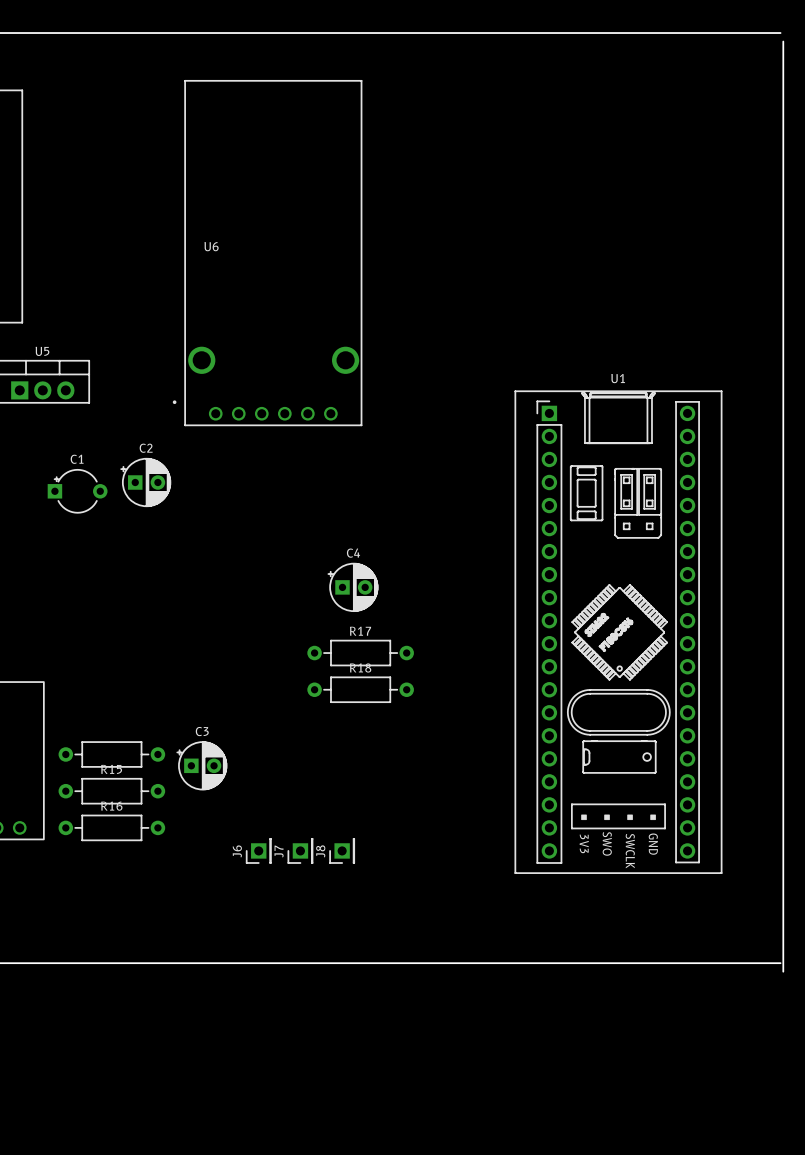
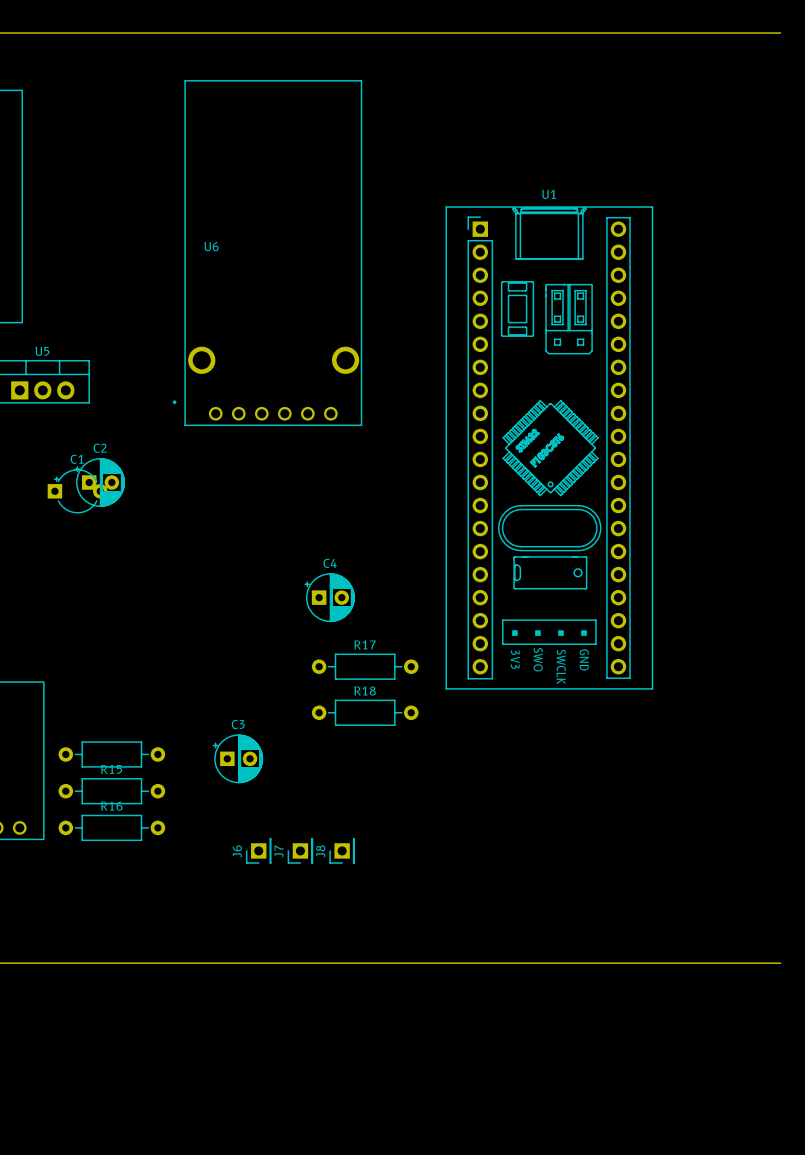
board edge: (783, 41) (783, 971) -> none
C2 position: (145, 482) -> (99, 482)
C4 position: (353, 587) -> (329, 597)
U1 position: (618, 632) -> (549, 447)
R17 position: (360, 653) -> (365, 666)
R18 position: (360, 689) -> (365, 712)
C3 position: (201, 765) -> (237, 758)

